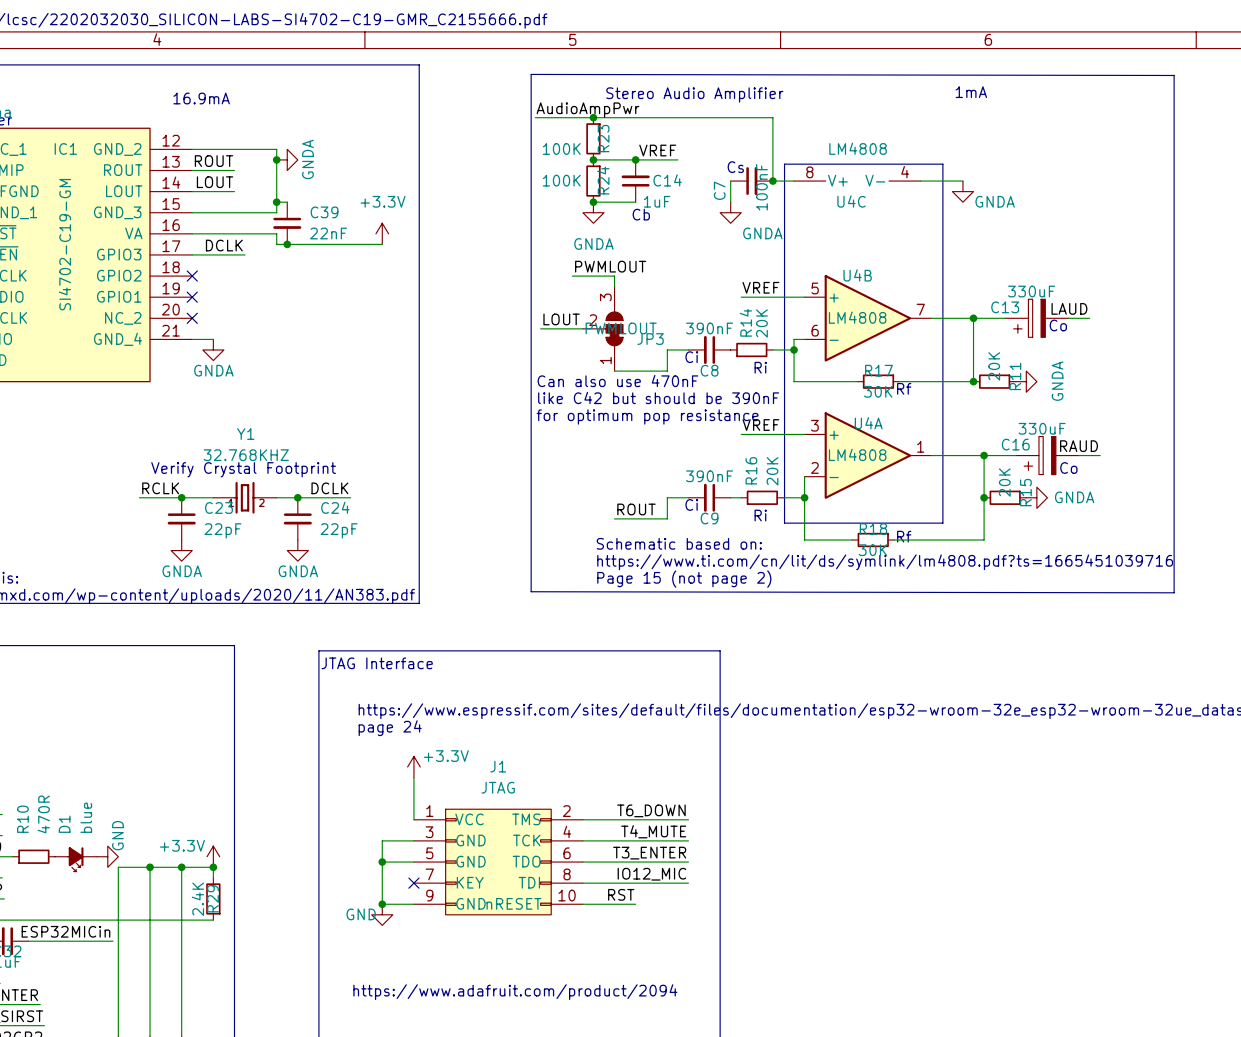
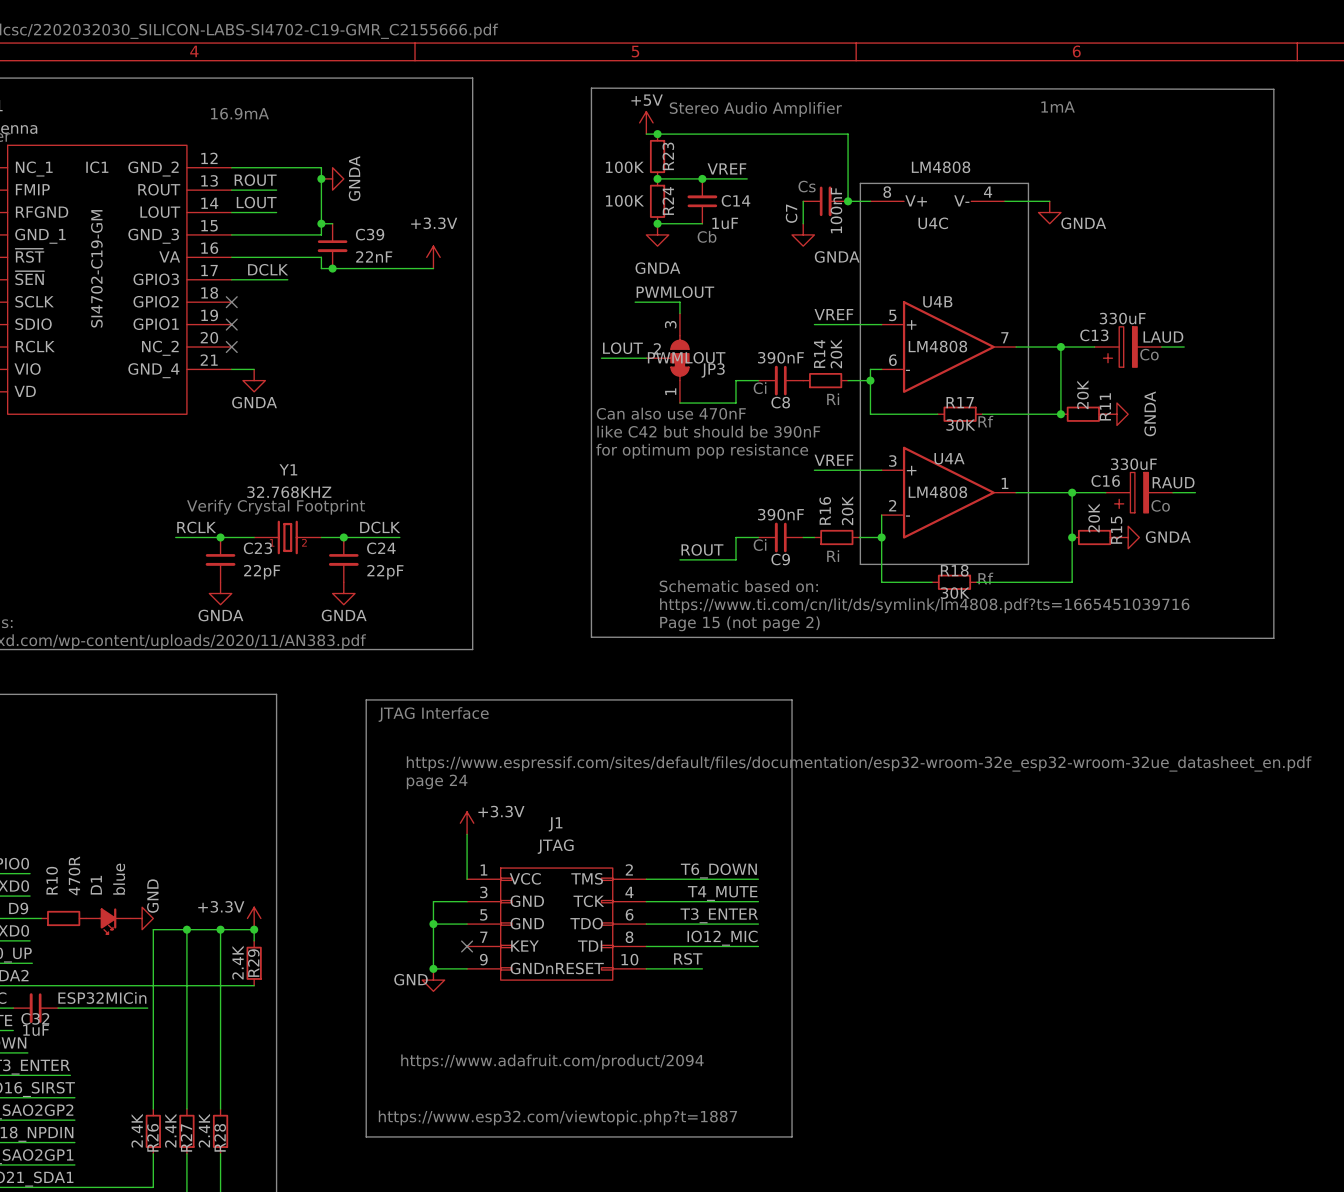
power symbol: none -> +5V (646, 122)
label: AudioAmpPwr (587, 110) -> none
wire: (535, 117) (582, 117) -> none

